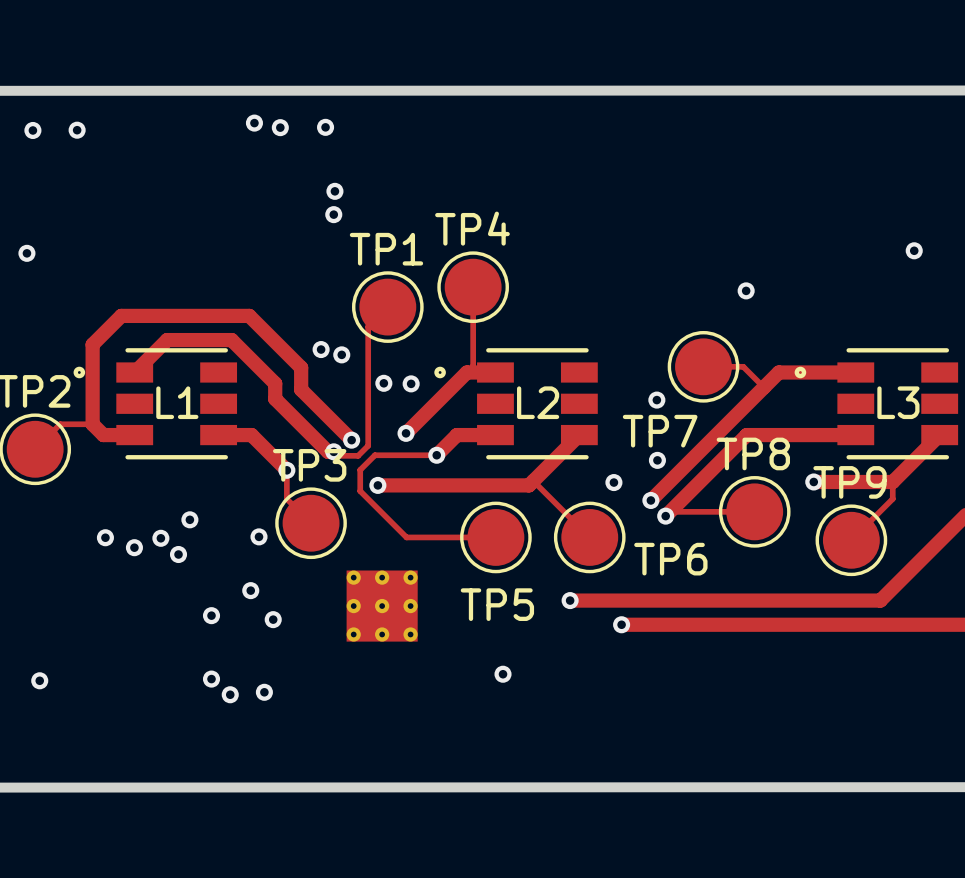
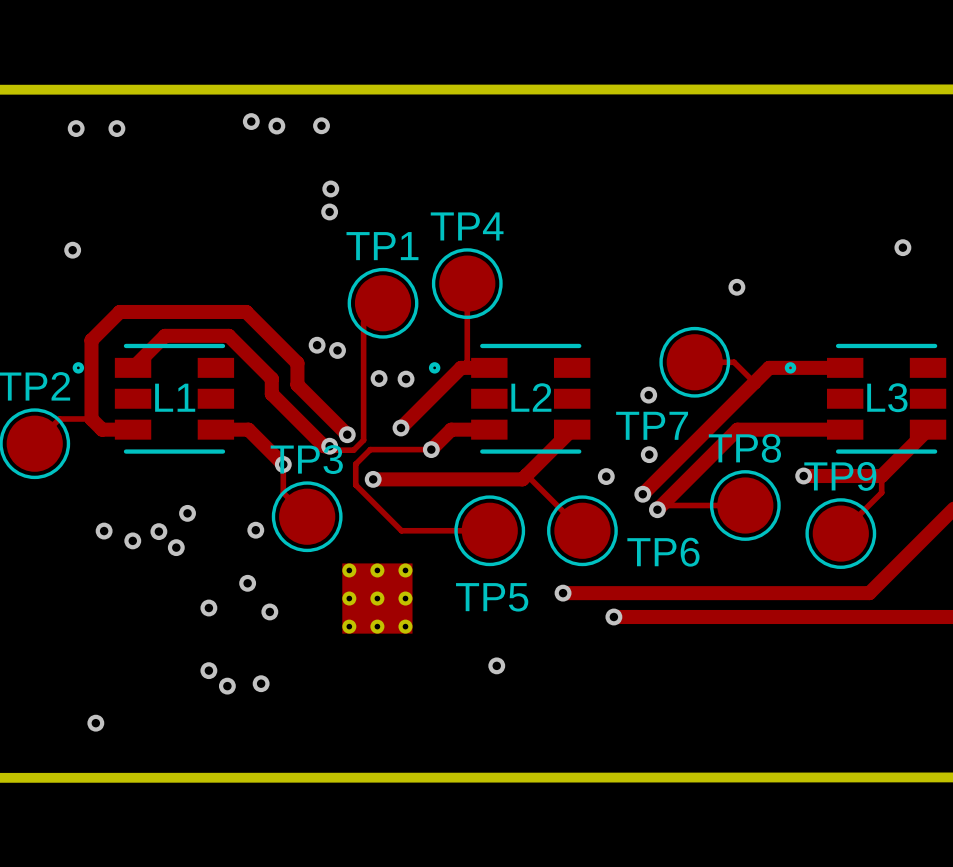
via: (32, 130) -> none
via: none -> (116, 128)
via position: (26, 253) -> (72, 250)
via position: (39, 680) -> (95, 723)

